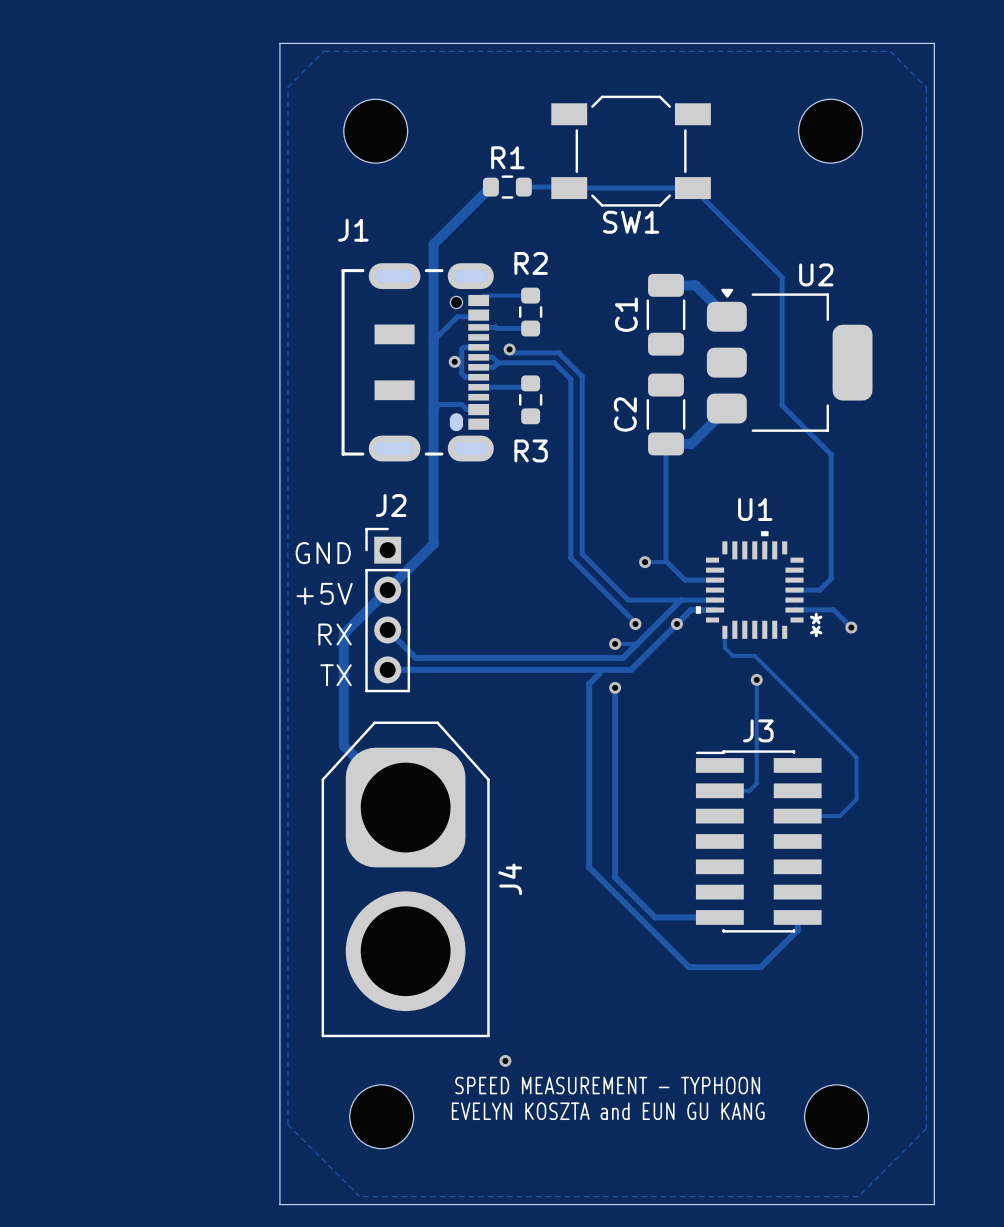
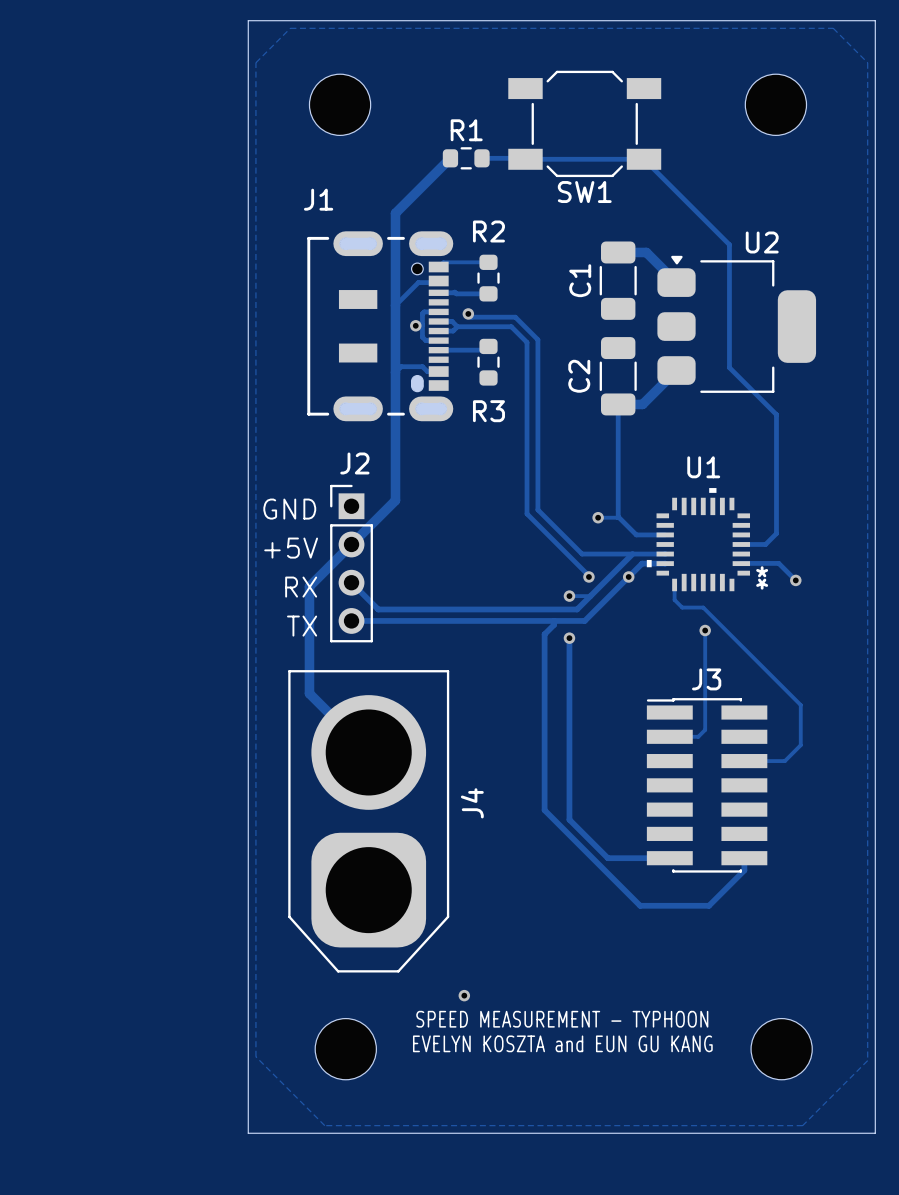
J4 rotation: 0° (405, 879) -> 180° (368, 821)

